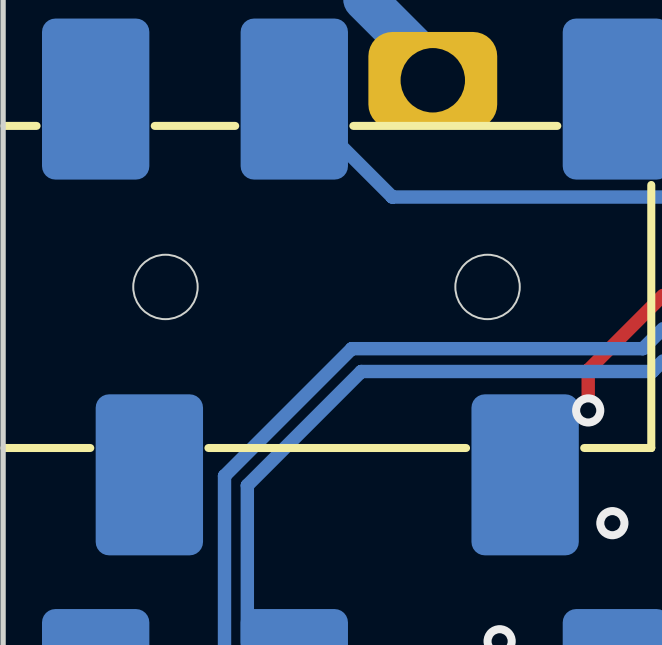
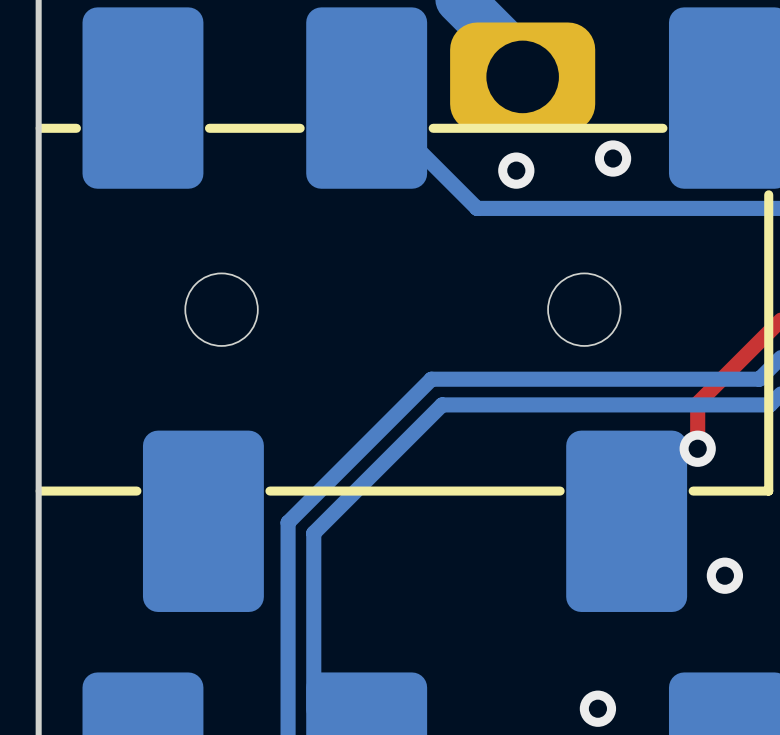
via: none -> (613, 158)
via: none -> (516, 170)

